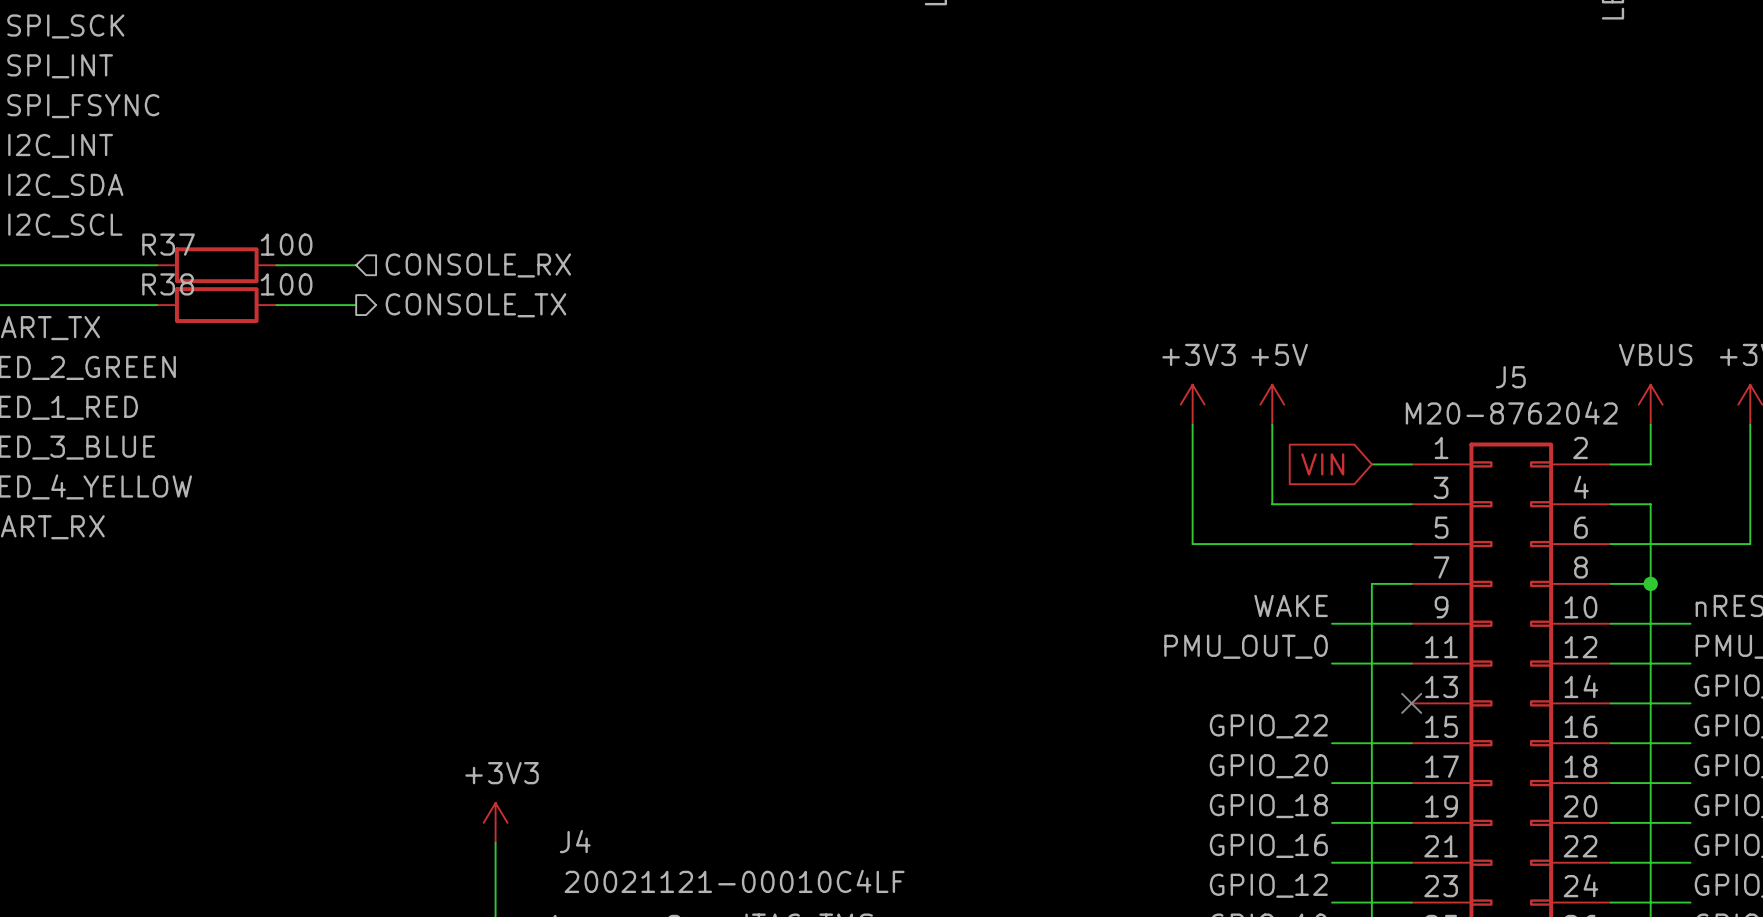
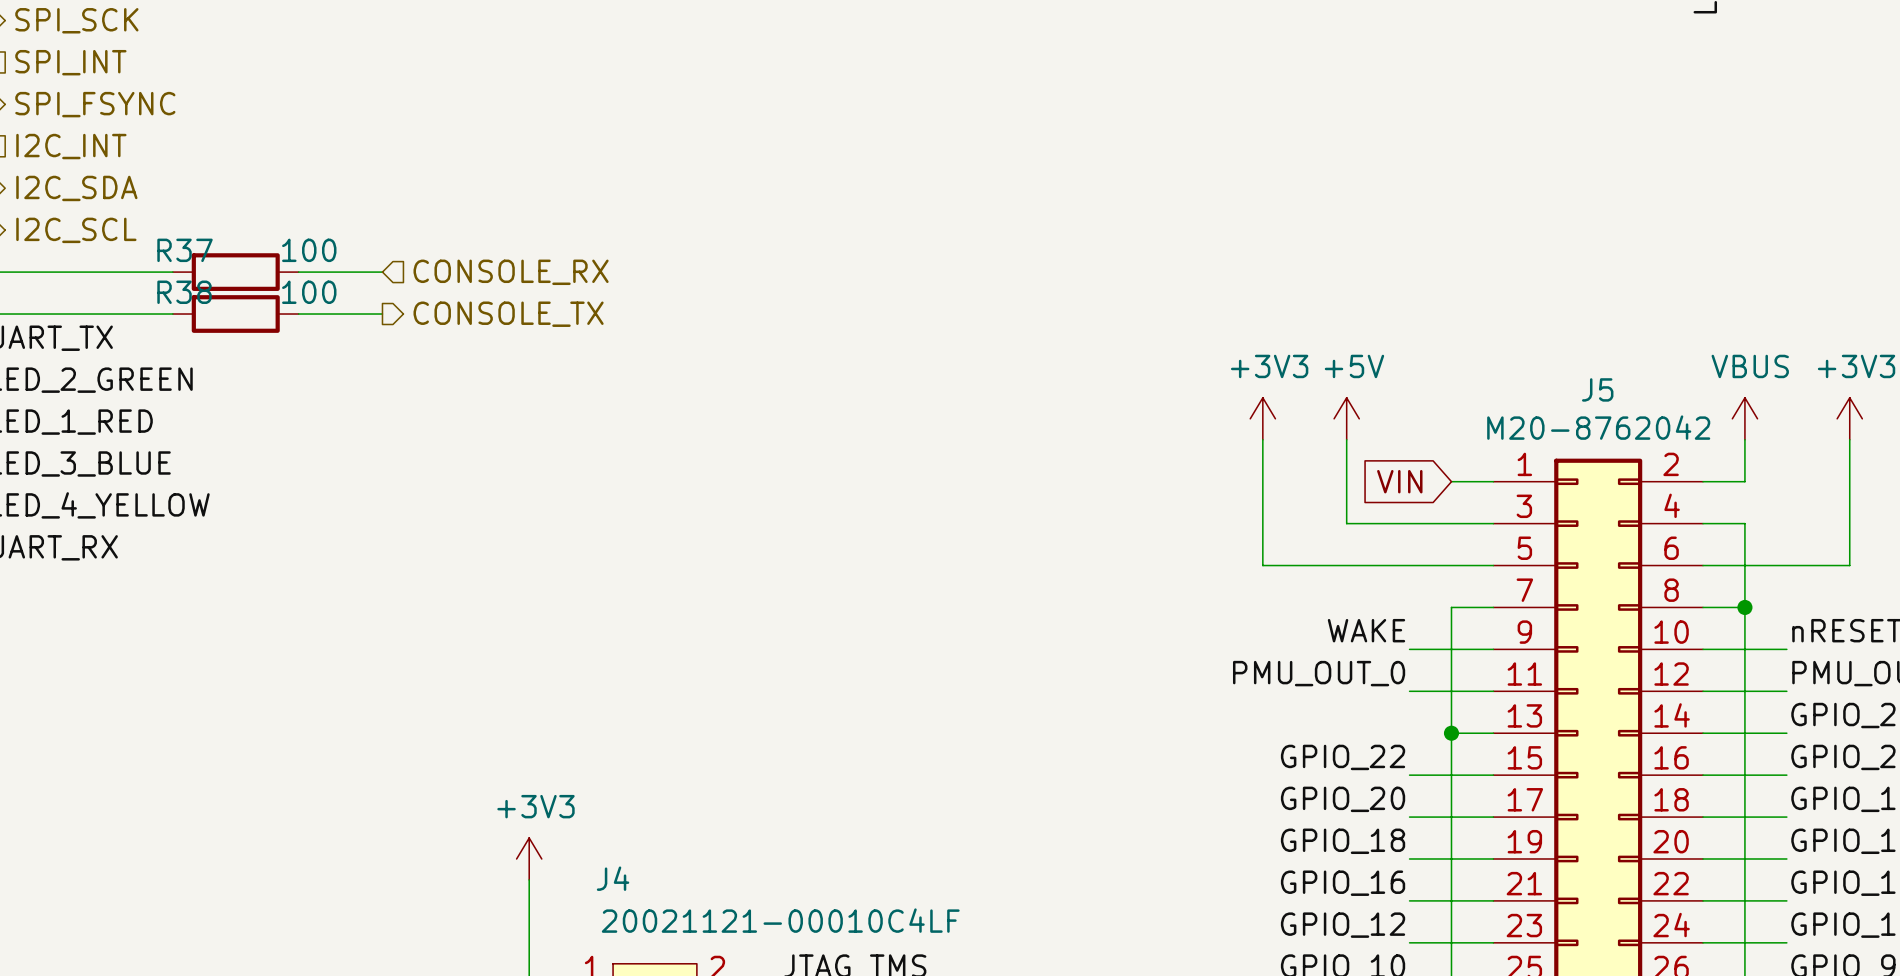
wire: none -> (1451, 733) (1493, 733)
junction: none -> (1451, 733)
no-connect mark: (1411, 703) -> none

